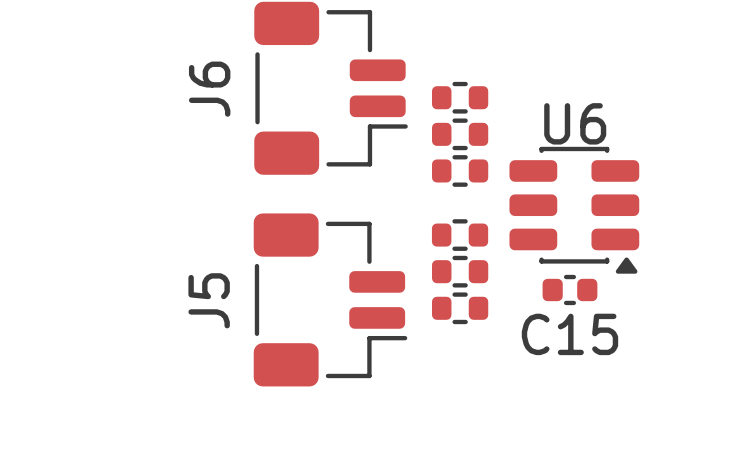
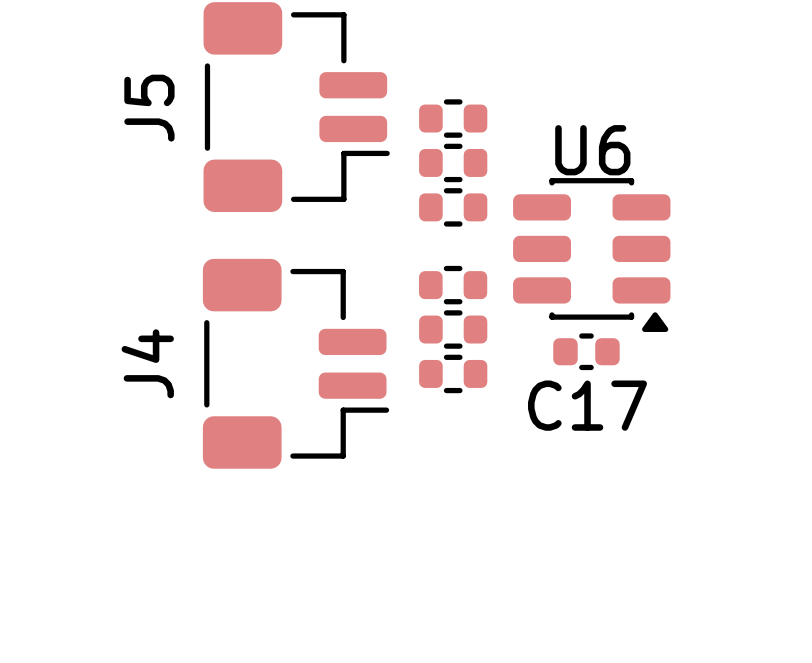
J6 name: J6 (209, 89) -> J5 (149, 108)
J5 name: J5 (209, 300) -> J4 (147, 363)
C15 name: C15 (569, 334) -> C17 (587, 405)

